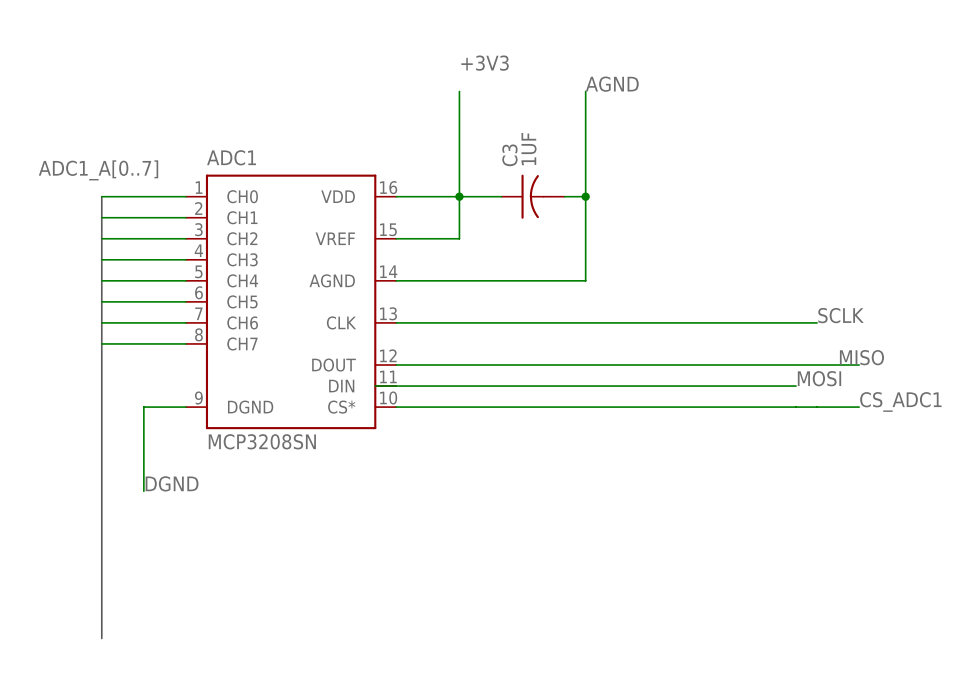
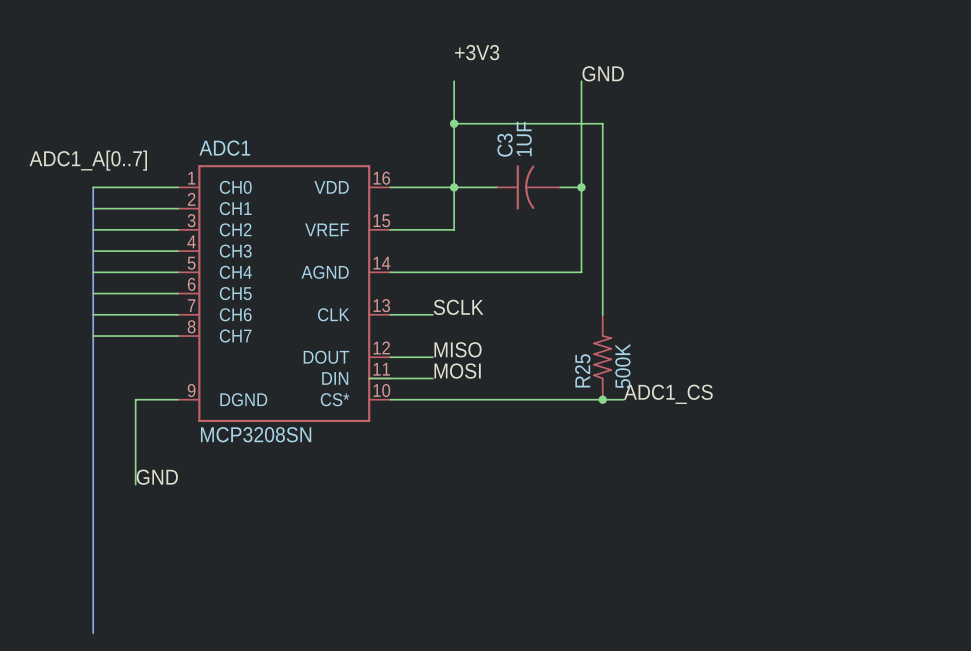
label: AGND (612, 84) -> GND (603, 73)
wire: none -> (454, 123) (602, 123) (602, 314)
junction: none -> (454, 123)
label: none -> SCLK (458, 307)
label: SCLK (841, 315) -> none
wire: (438, 322) (817, 322) -> none
label: none -> MISO (458, 349)
label: MISO (861, 357) -> none
wire: (438, 365) (859, 365) -> none
R25: none -> 500K (602, 357)
label: none -> MOSI (457, 371)
label: MOSI (819, 378) -> none
wire: (438, 386) (796, 386) -> none
label: none -> ADC1_CS (668, 394)
label: CS_ADC1 (900, 401) -> none
junction: none -> (602, 399)
wire: (627, 407) (859, 407) -> none
label: DGND (172, 483) -> GND (157, 477)

